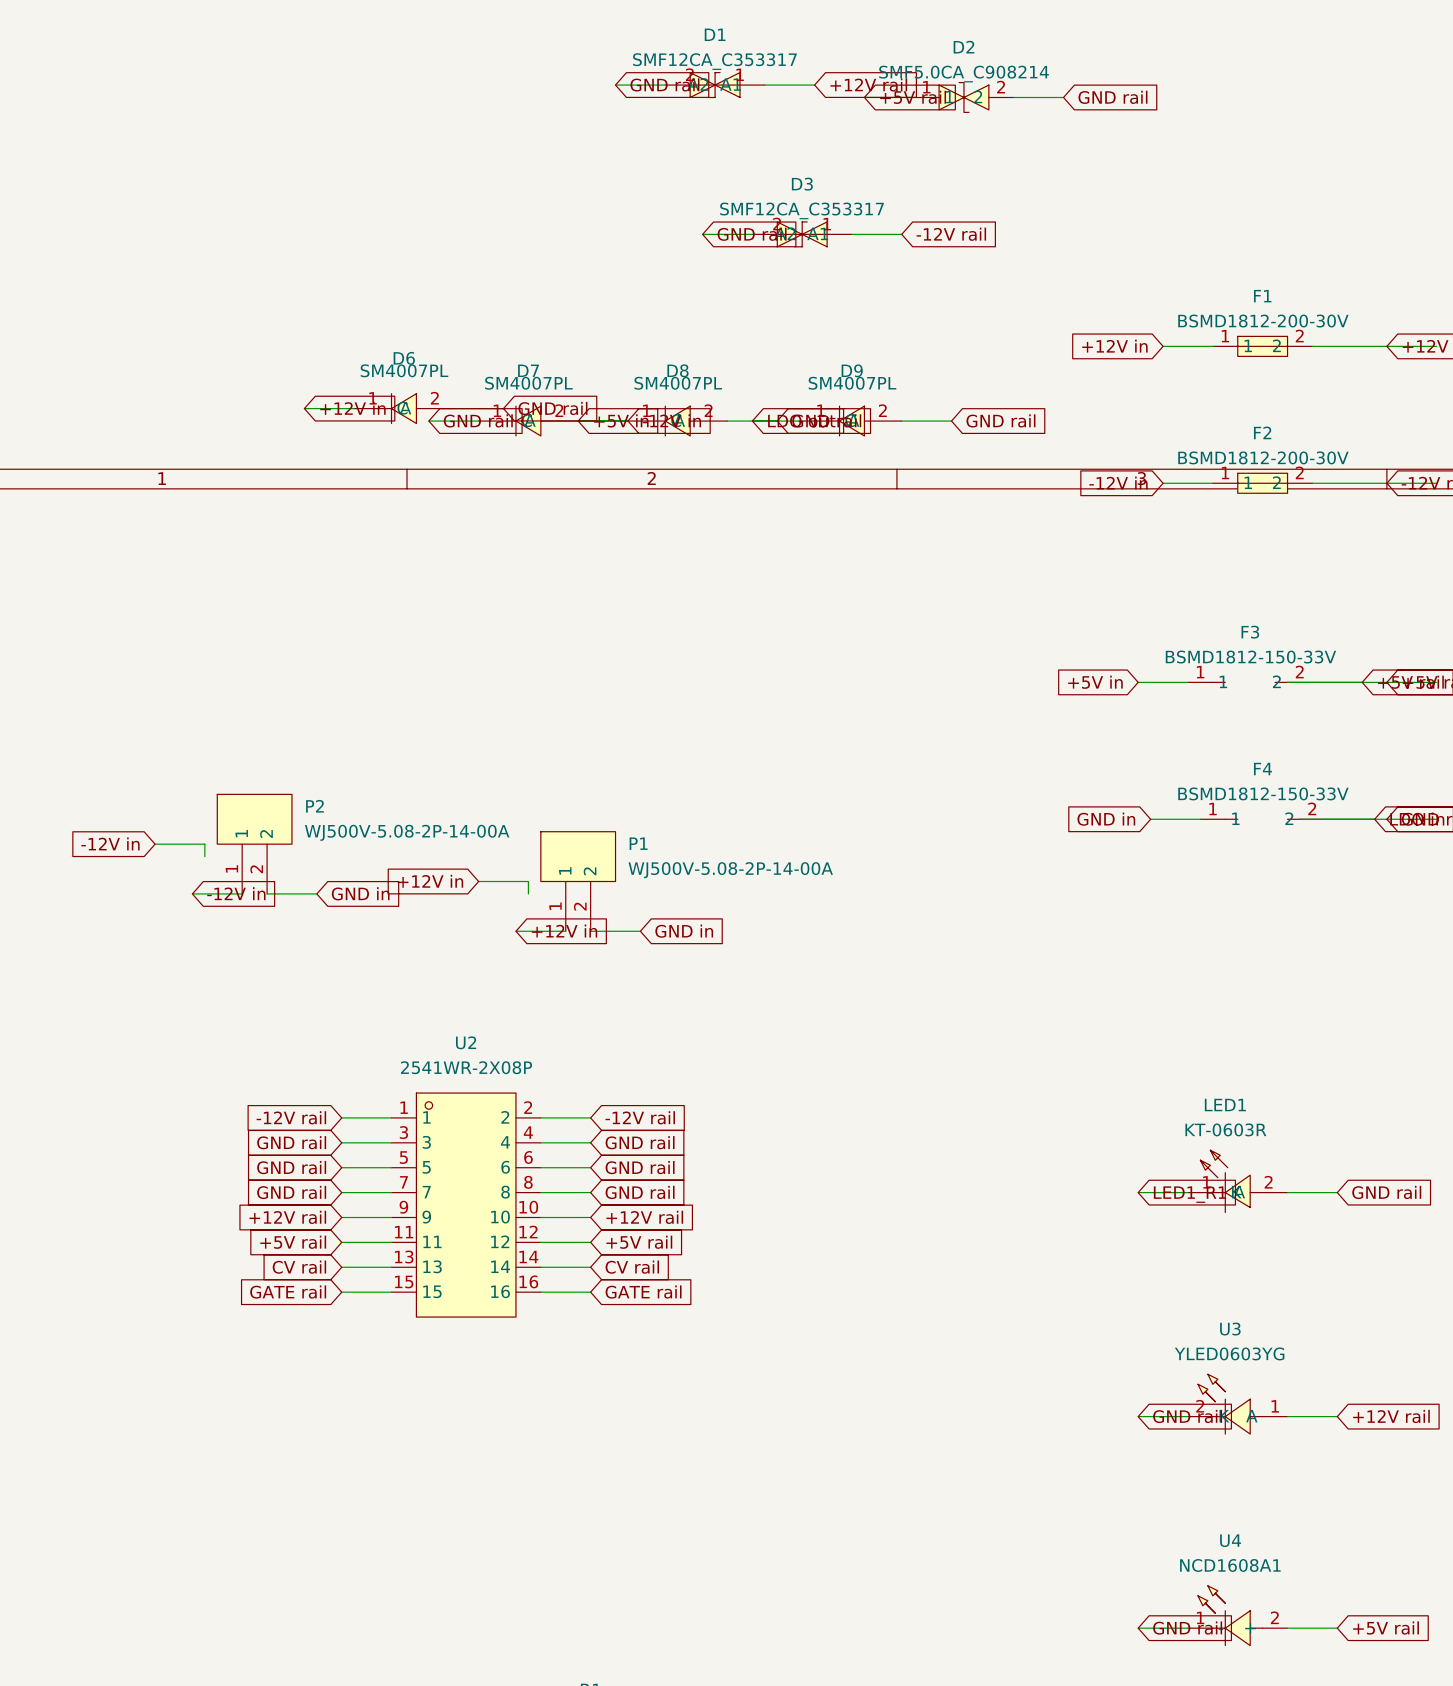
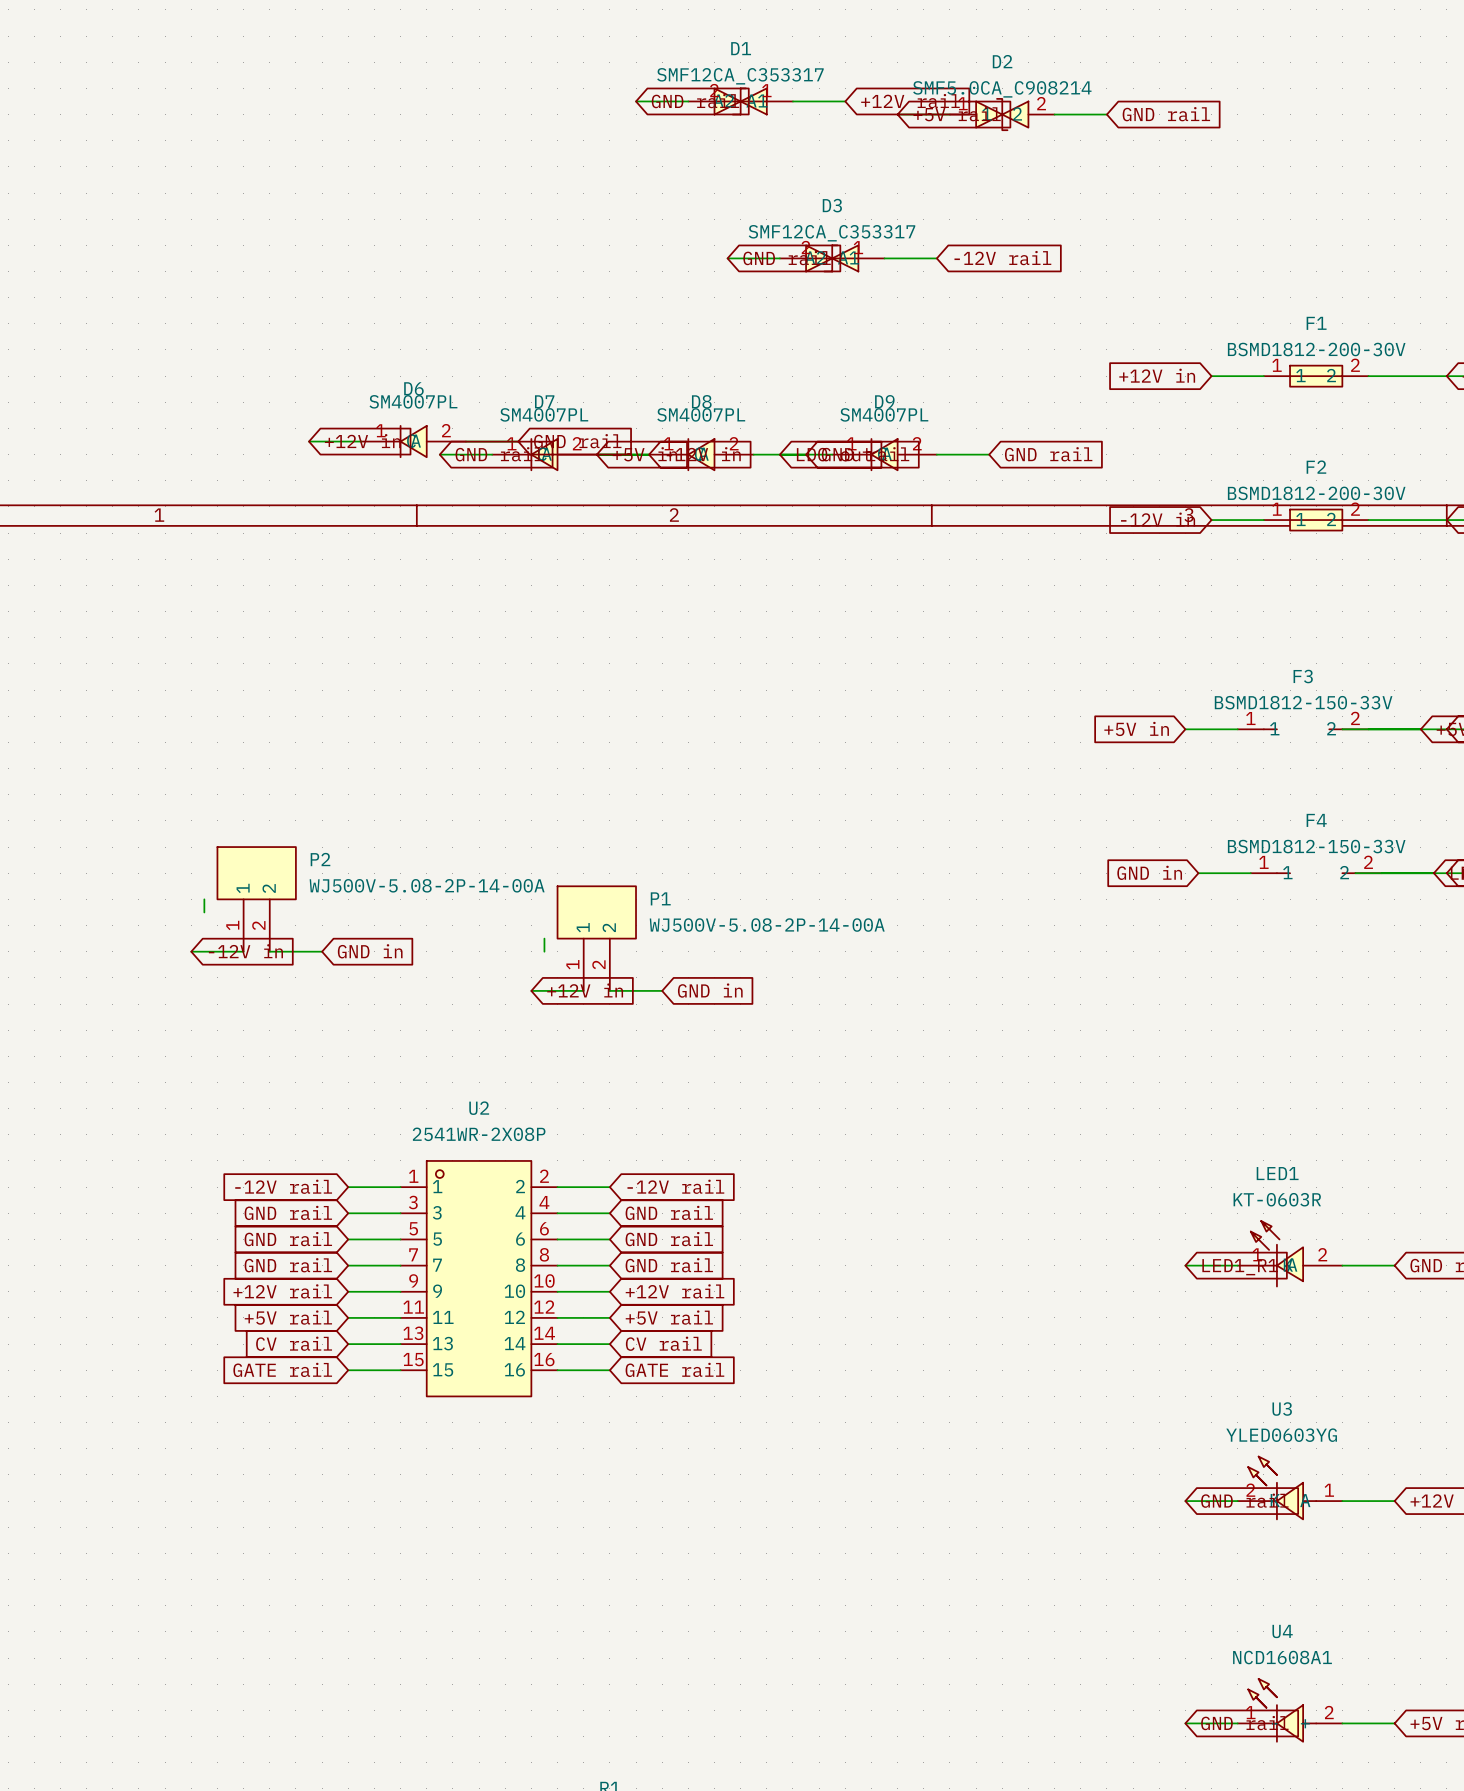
global label: -12V in (110, 843) -> none
wire: (155, 844) (204, 844) -> none
global label: +12V in (430, 881) -> none
wire: (478, 881) (528, 881) -> none

